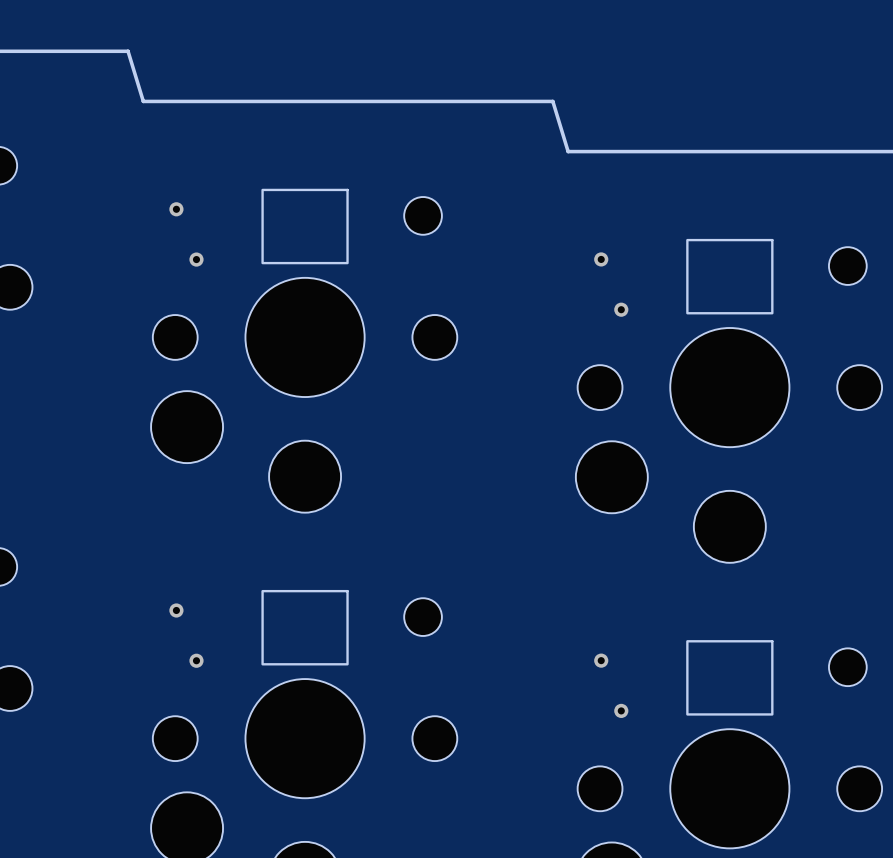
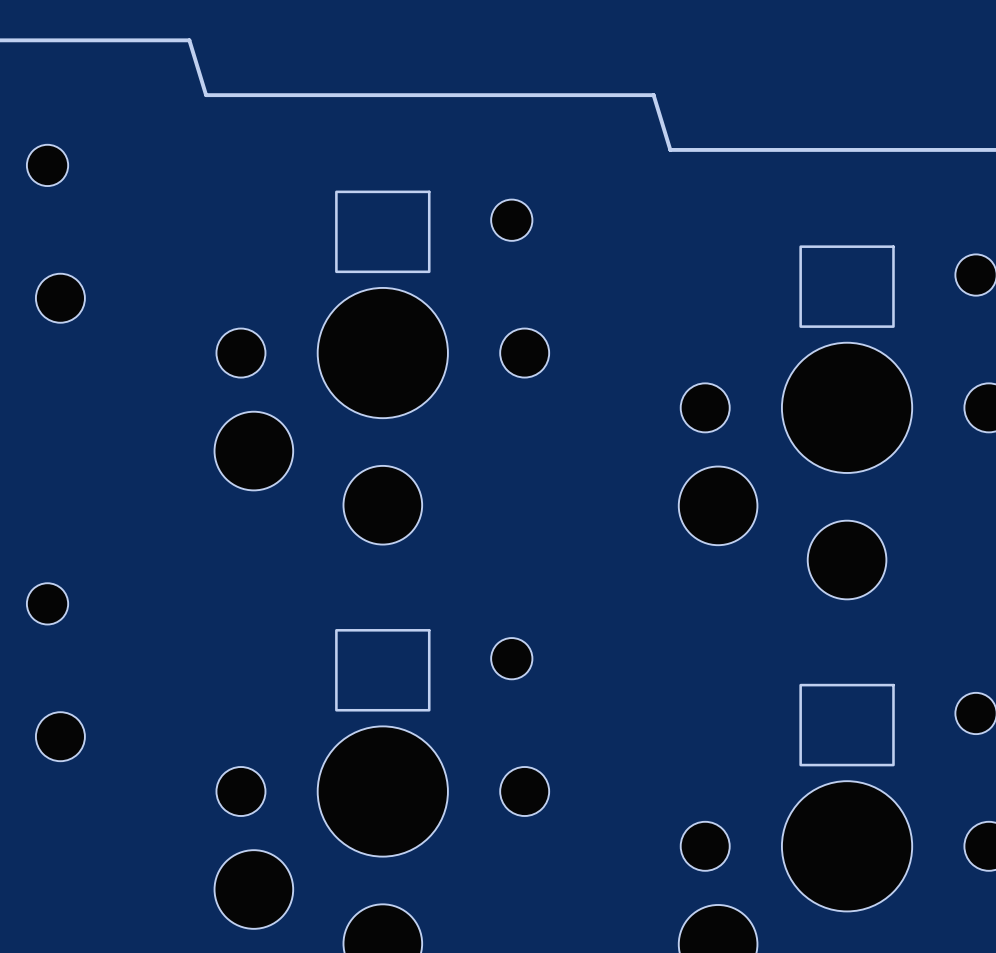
via: (176, 209) -> none
via: (196, 259) -> none
via: (601, 259) -> none
via: (621, 309) -> none
via: (176, 610) -> none
via: (196, 660) -> none
via: (601, 660) -> none
via: (621, 710) -> none

